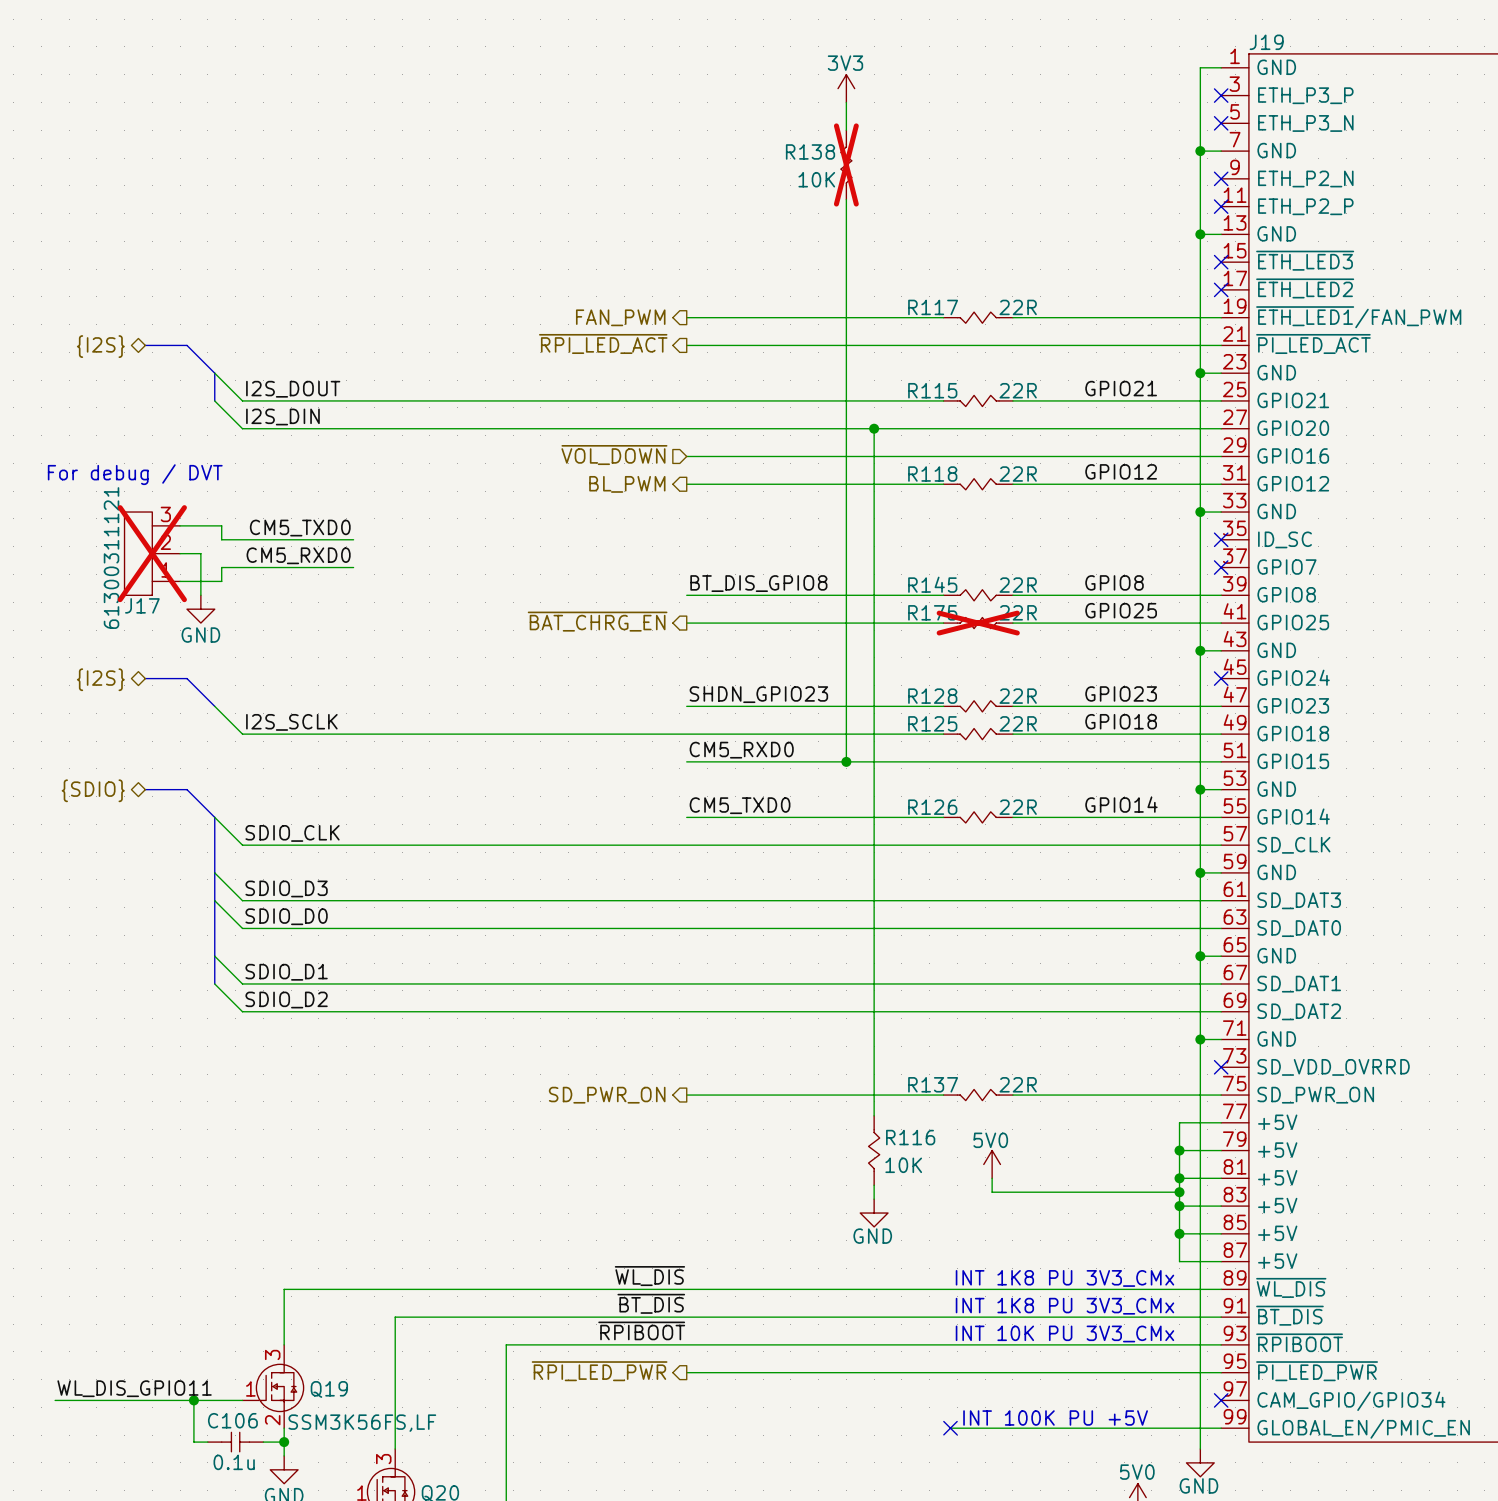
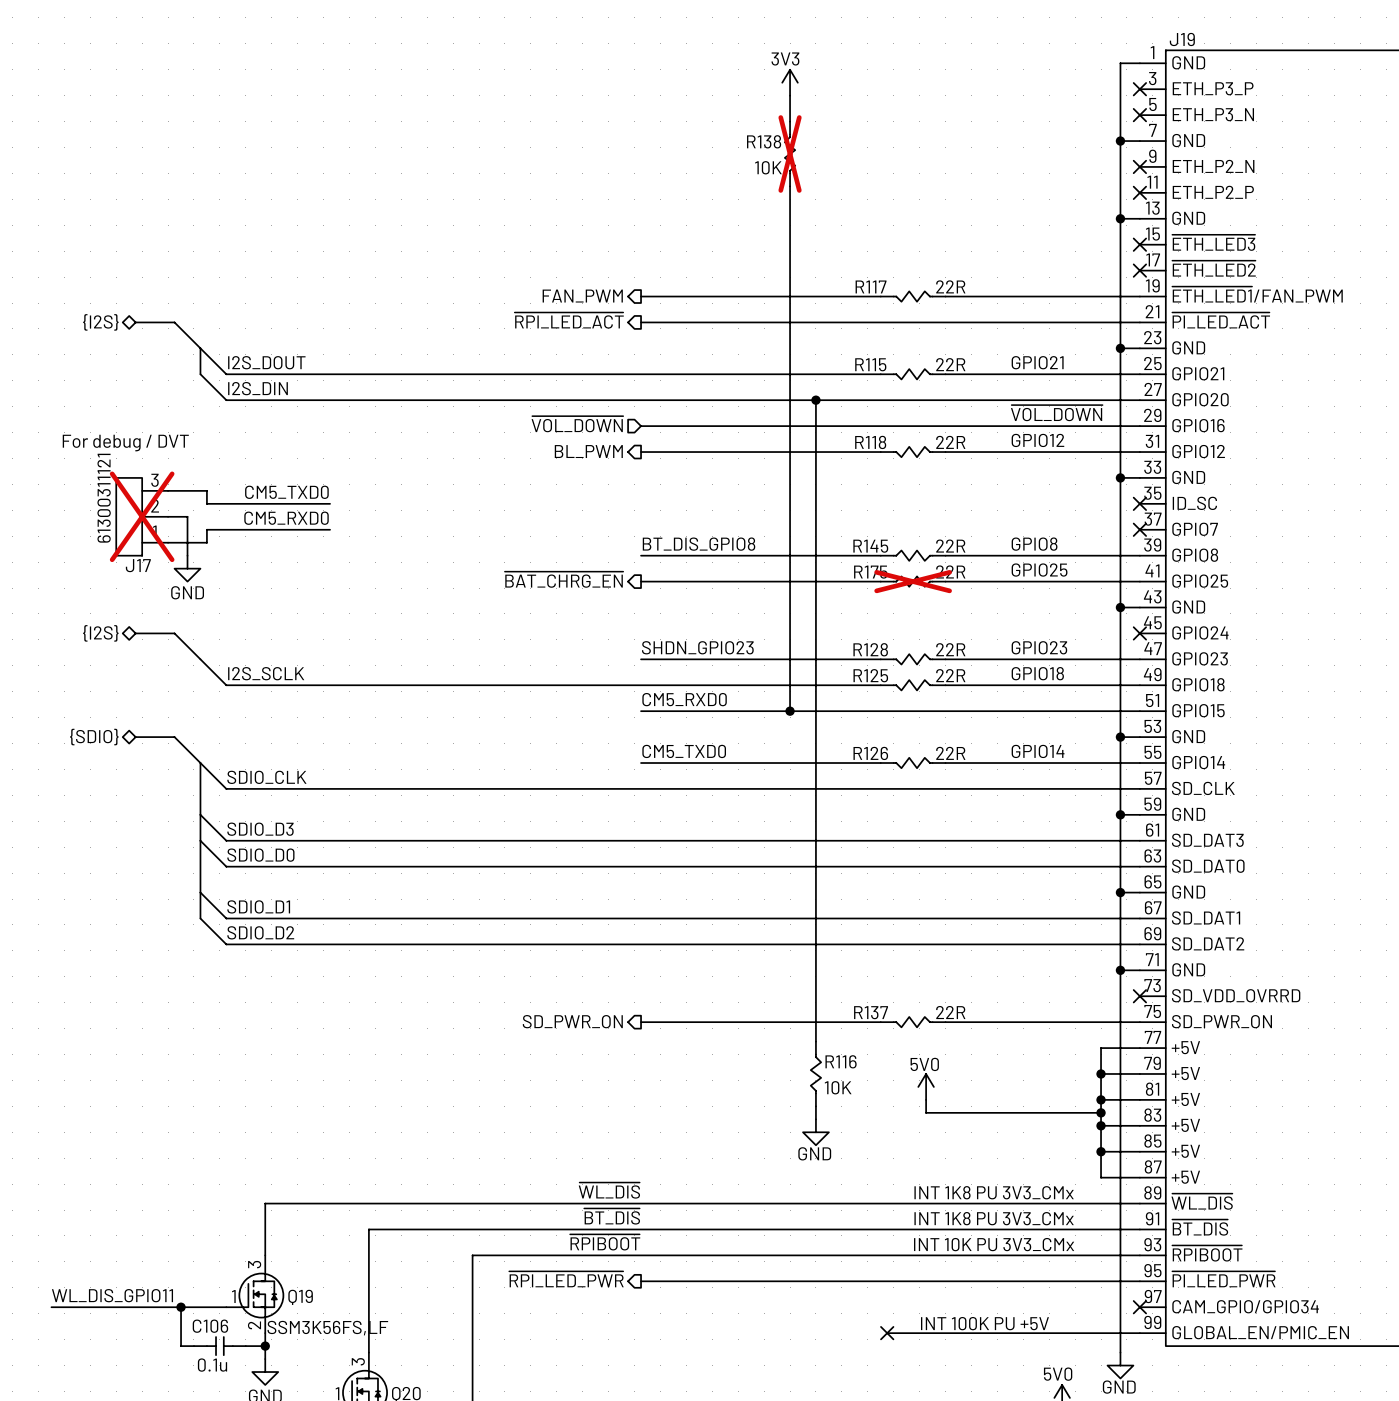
label: none -> ~{VOL_DOWN} (1056, 413)

